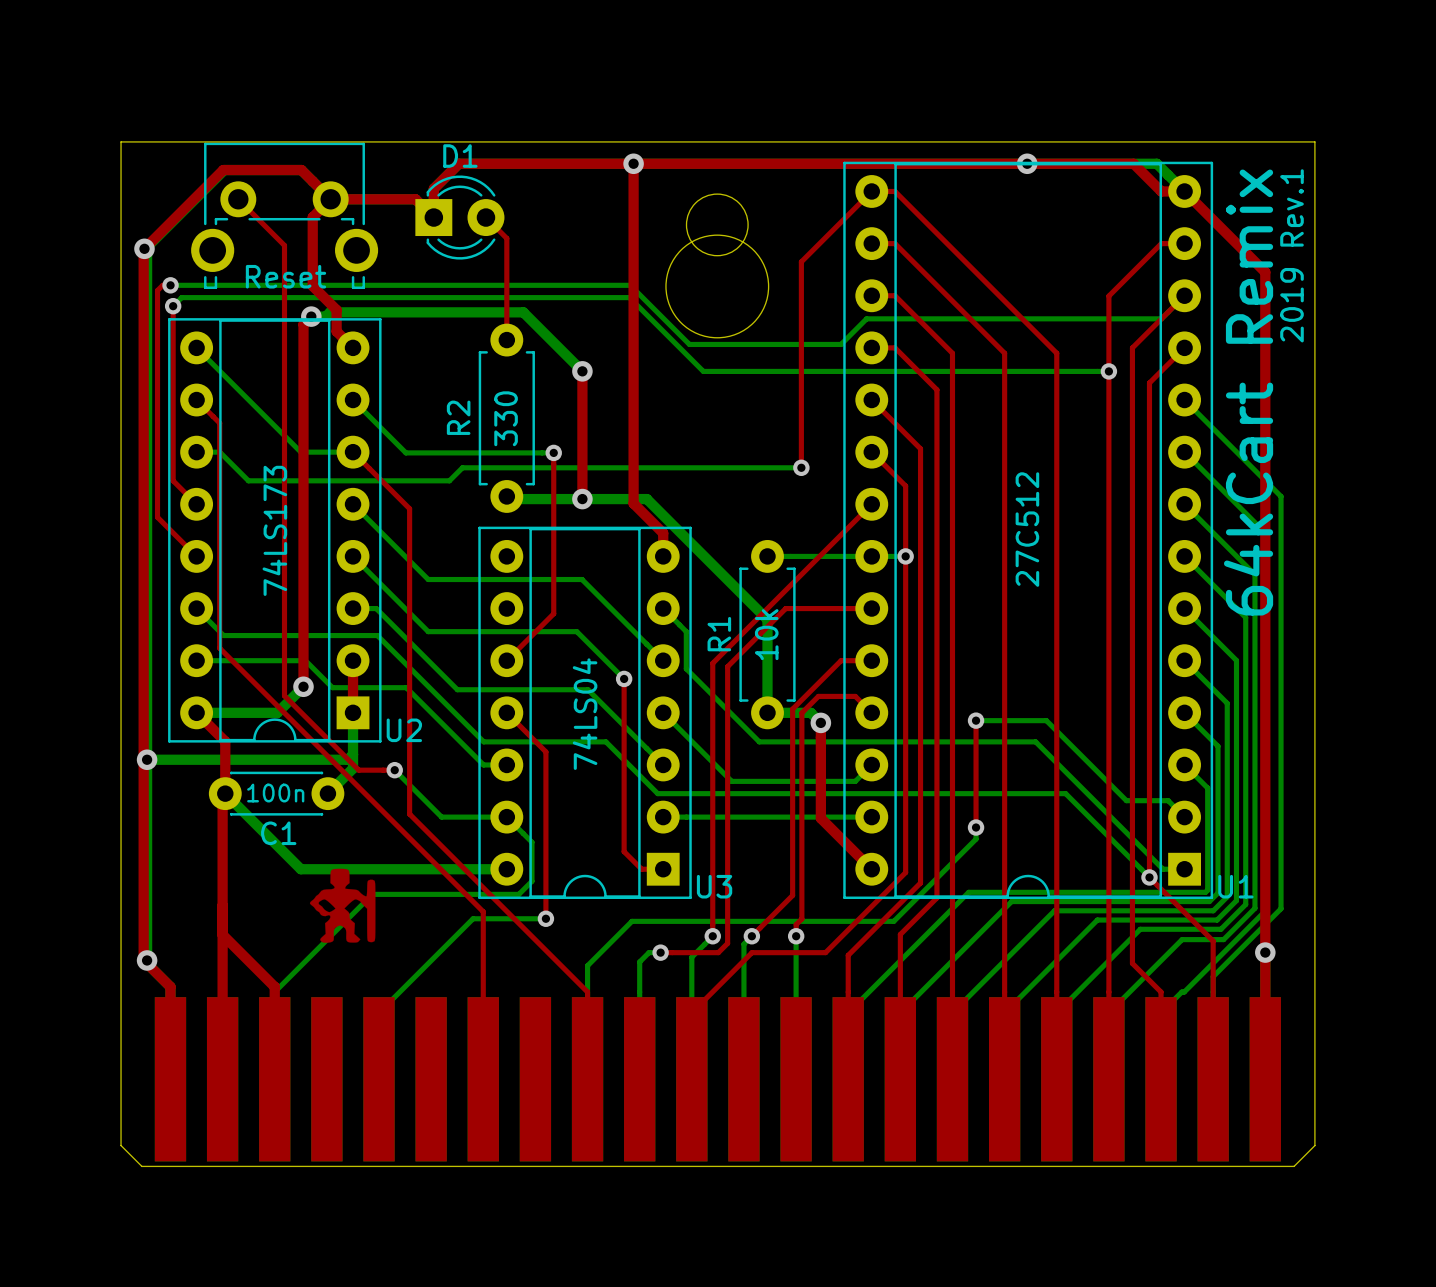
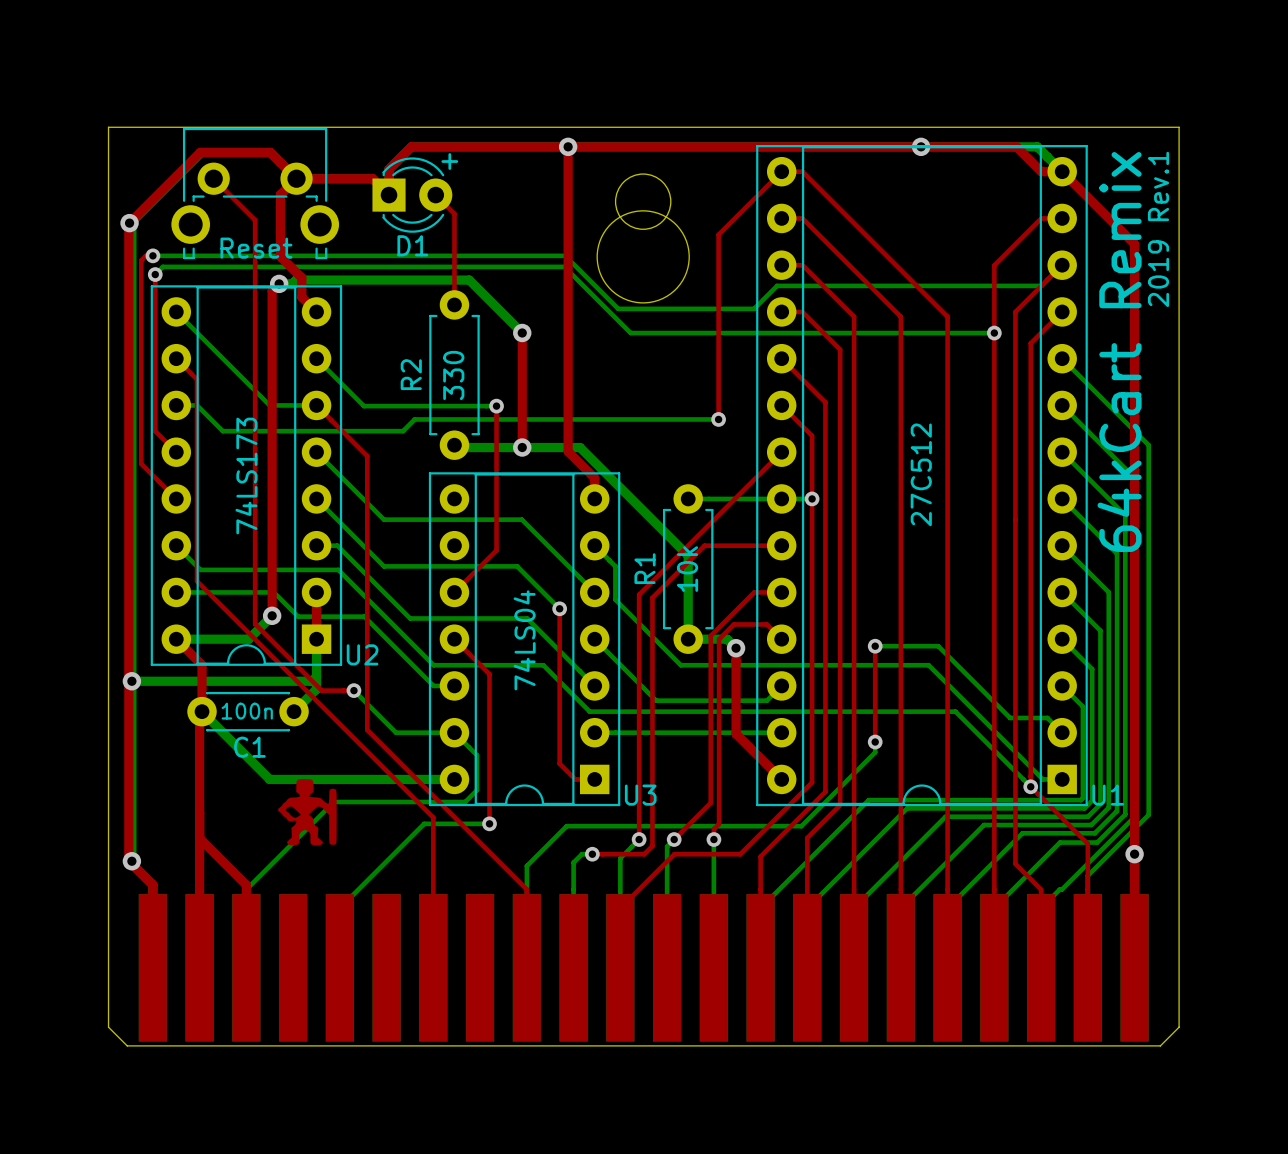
D1 name position: D1 (460, 156) -> D1 (412, 245)
text: none -> + (449, 161)

